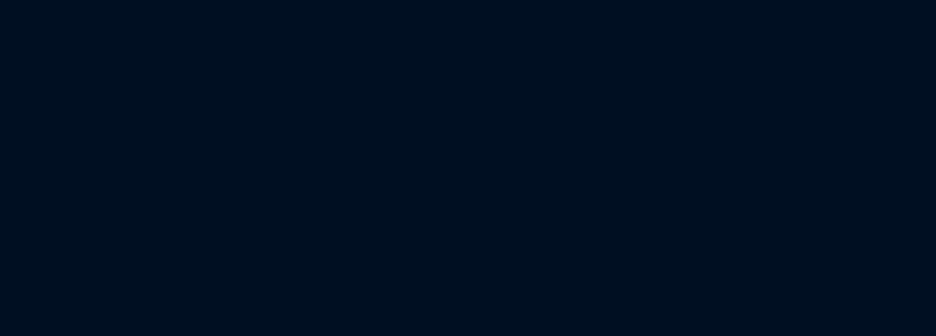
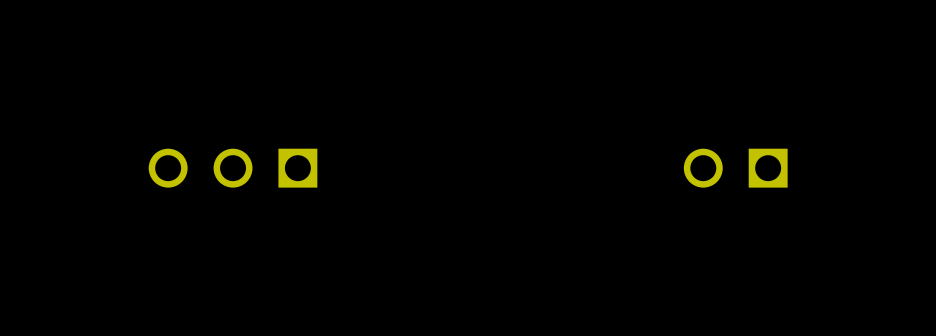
part: none -> (233, 168)
part: none -> (735, 168)

